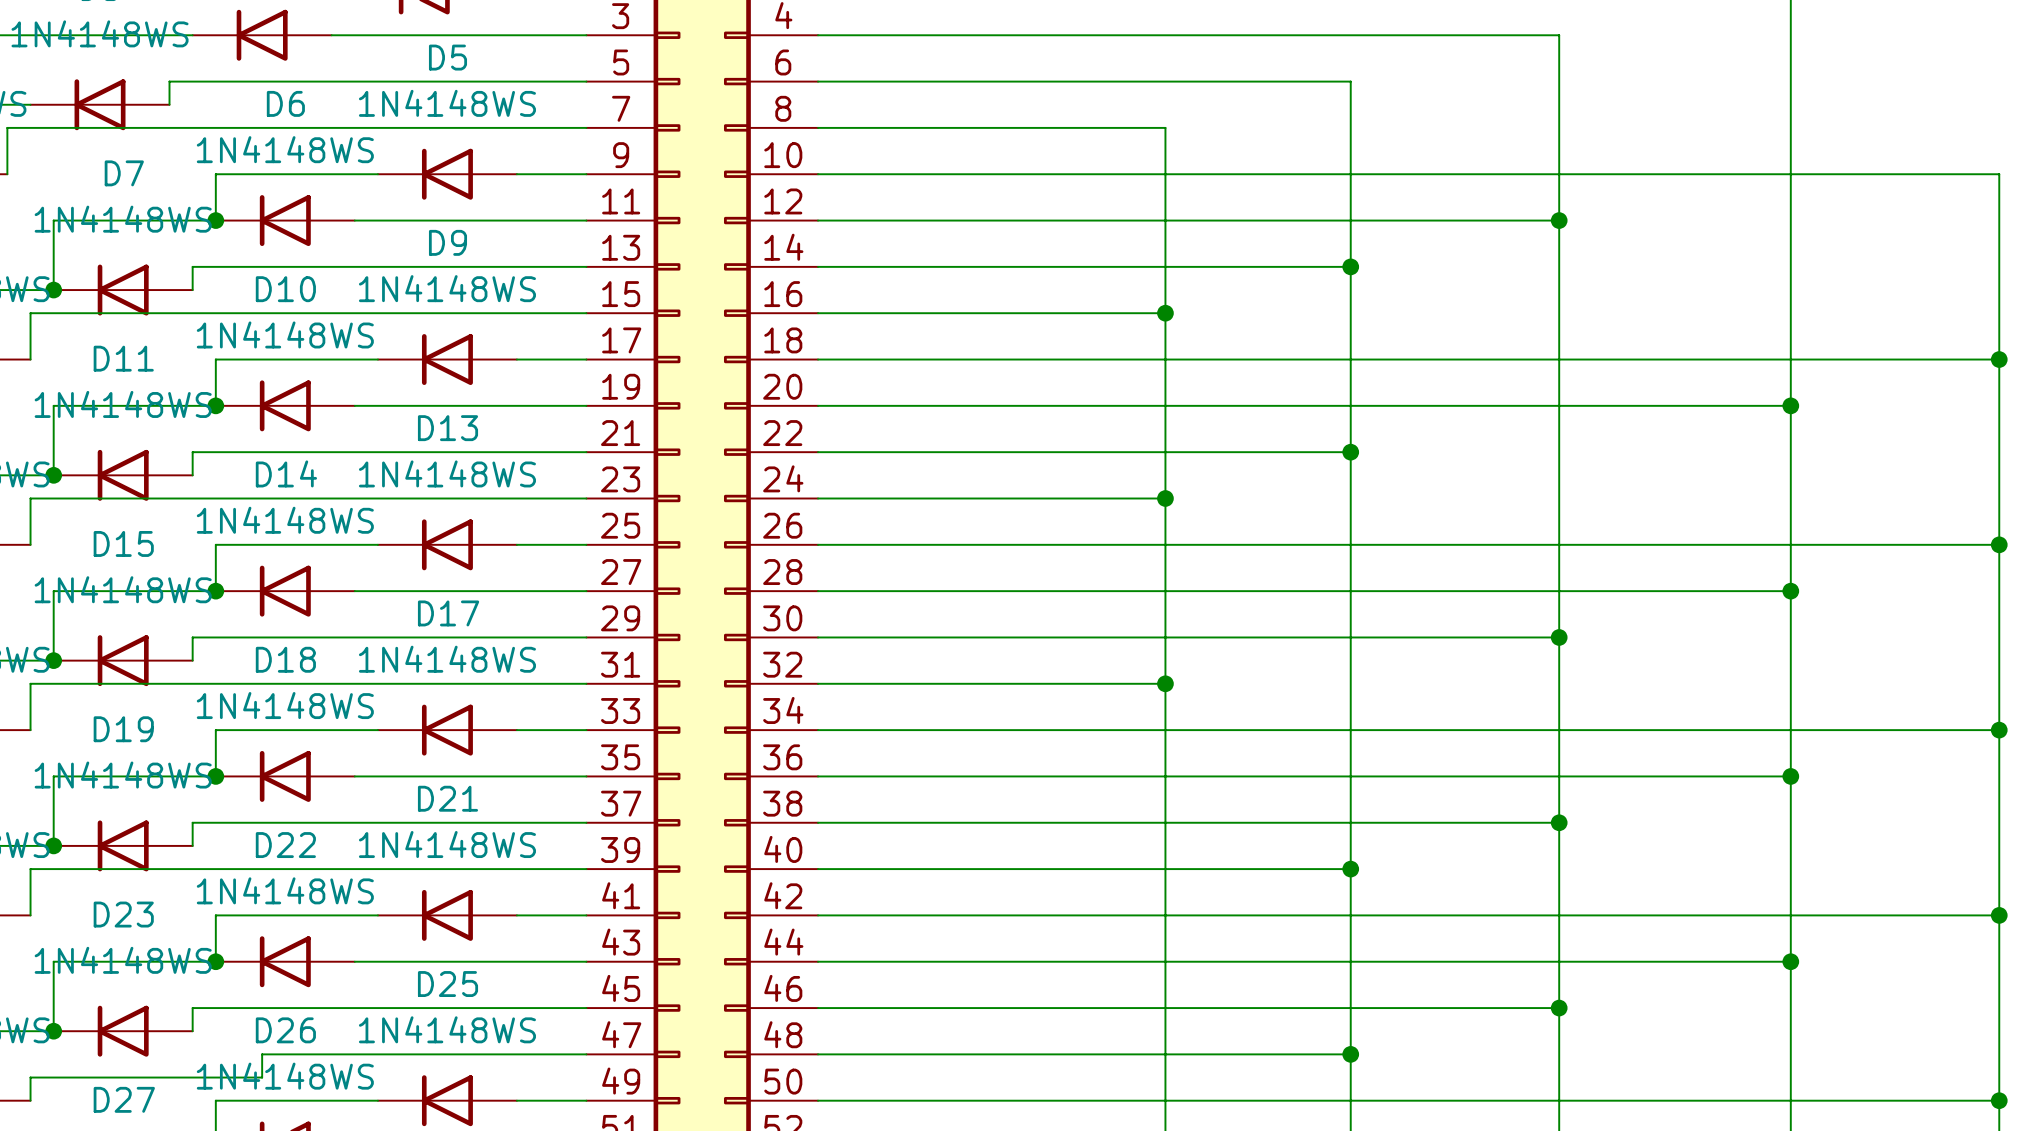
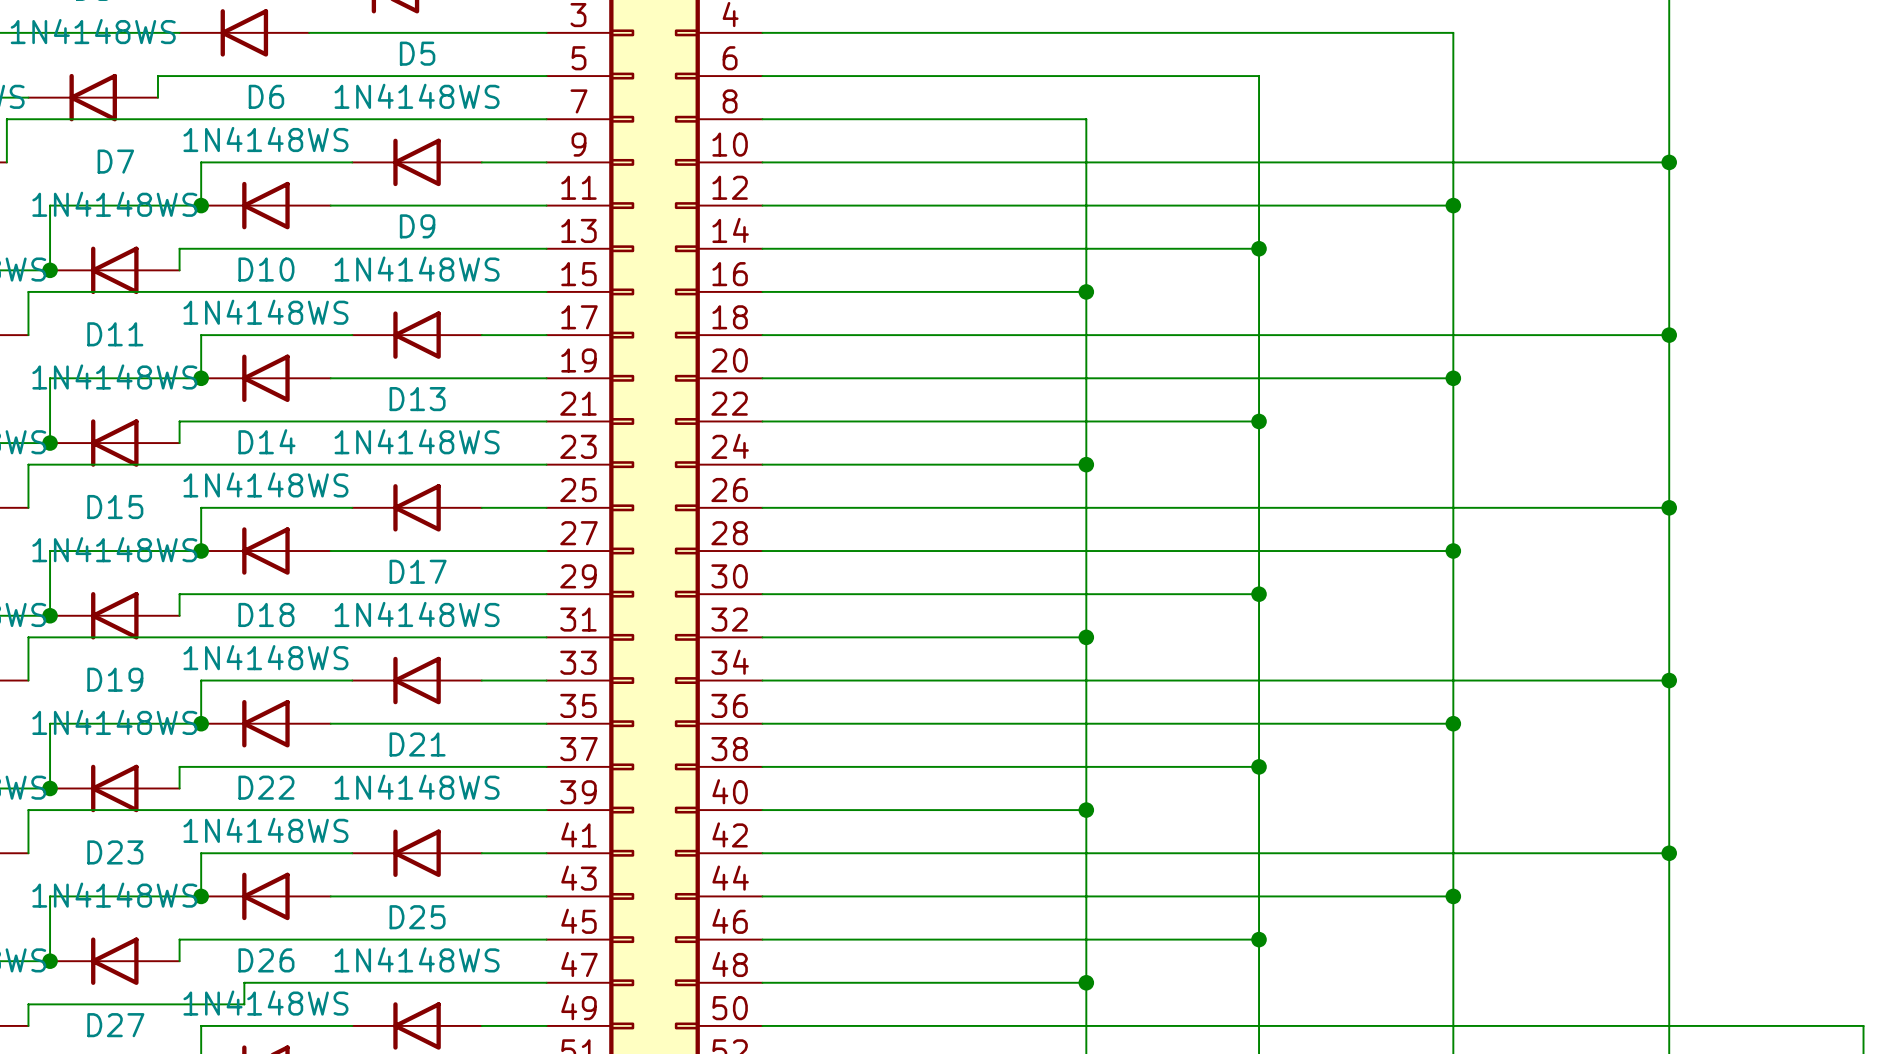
wire: (1790, 174) (1999, 174) (1999, 1100) -> none
junction: none -> (1669, 162)
wire: (1790, 359) (1999, 359) -> none
junction: (1999, 359) -> none
wire: (1559, 405) (1790, 405) -> none
junction: none -> (1453, 378)
junction position: (1790, 405) -> (1669, 335)
wire: (1790, 544) (1999, 544) -> none
junction: (1999, 544) -> none
wire: (1559, 591) (1790, 591) -> none
junction position: (1790, 591) -> (1669, 507)
wire: (1350, 637) (1559, 637) -> none
junction: none -> (1259, 594)
junction position: (1559, 637) -> (1453, 551)
wire: (1790, 730) (1999, 730) -> none
junction: (1999, 730) -> none
wire: (1559, 776) (1790, 776) -> none
junction position: (1790, 776) -> (1669, 680)
wire: (1350, 822) (1559, 822) -> none
junction position: (1559, 822) -> (1453, 723)
wire: (1165, 869) (1350, 869) -> none
junction: none -> (1086, 810)
junction position: (1350, 869) -> (1259, 766)
wire: (1790, 915) (1999, 915) -> none
junction: (1999, 915) -> none
wire: (1559, 961) (1790, 961) -> none
junction position: (1790, 961) -> (1669, 853)
wire: (1350, 1008) (1559, 1008) -> none
junction position: (1559, 1008) -> (1453, 896)
wire: (1165, 1054) (1350, 1054) -> none
junction: none -> (1086, 982)
junction position: (1350, 1054) -> (1259, 939)
junction: (1999, 1100) -> none

